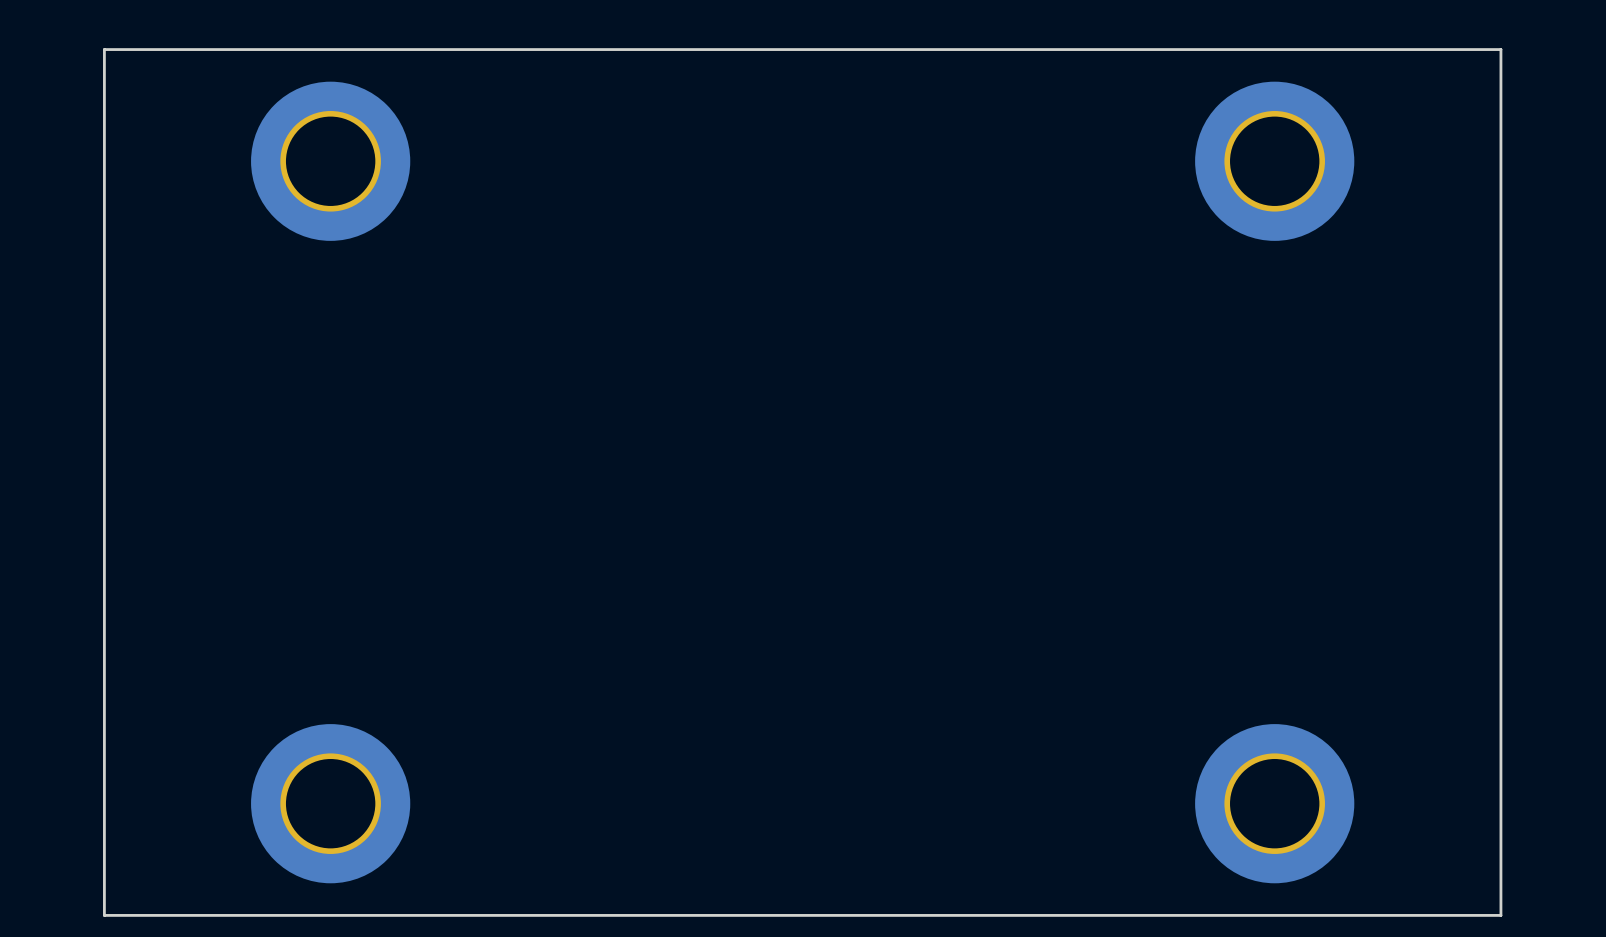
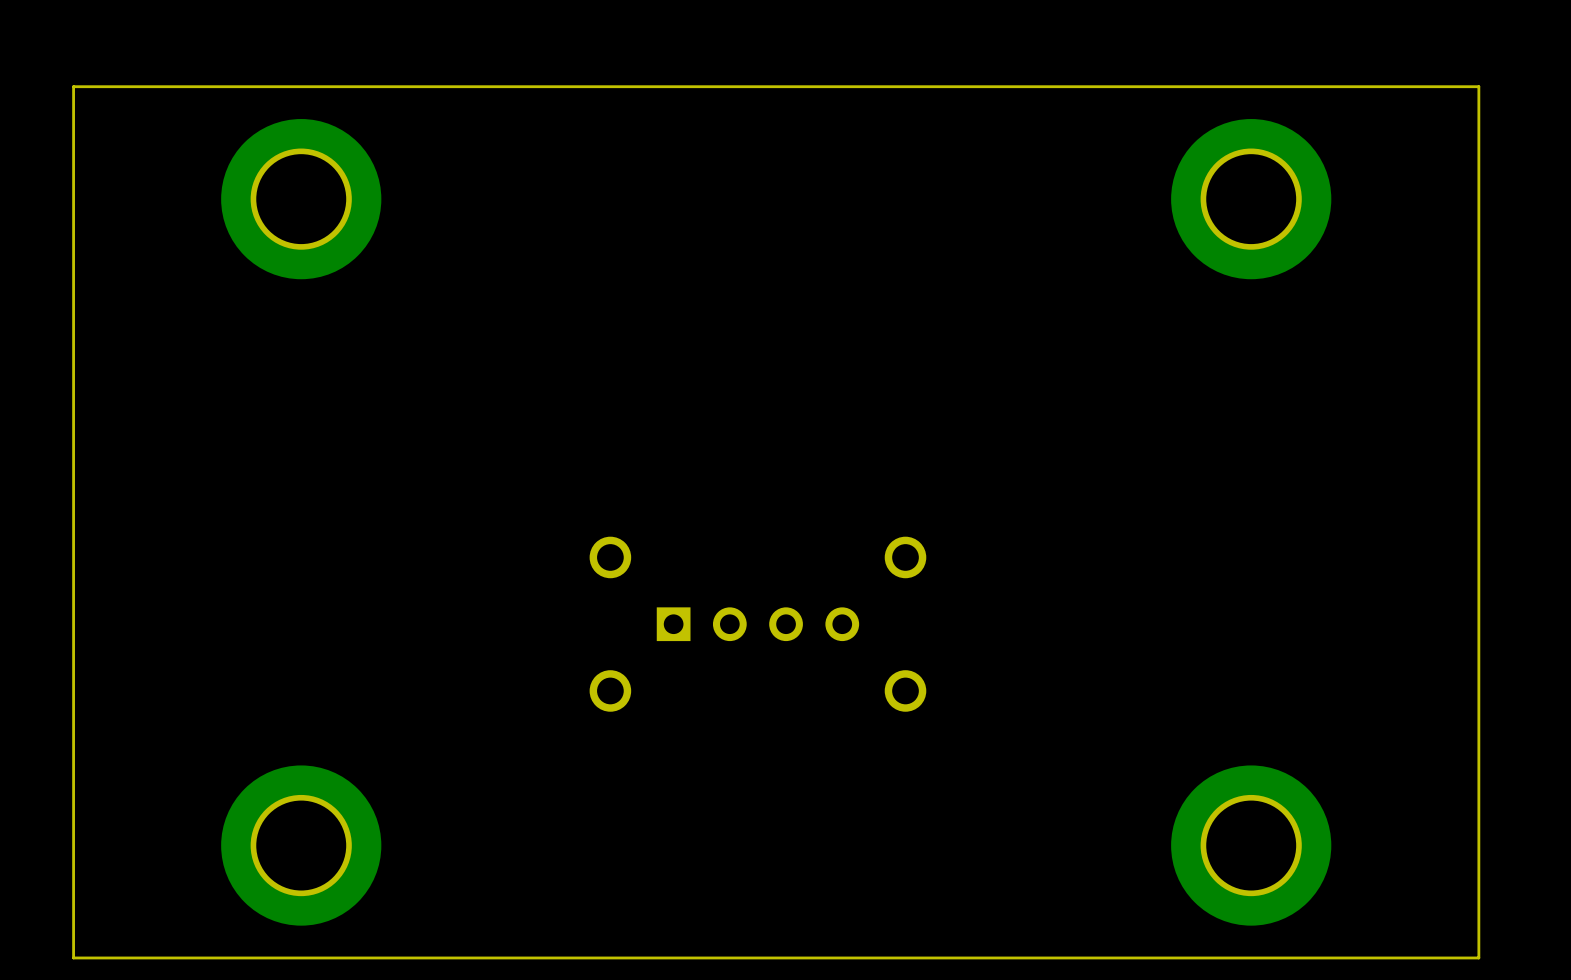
part: none -> (757, 624)

